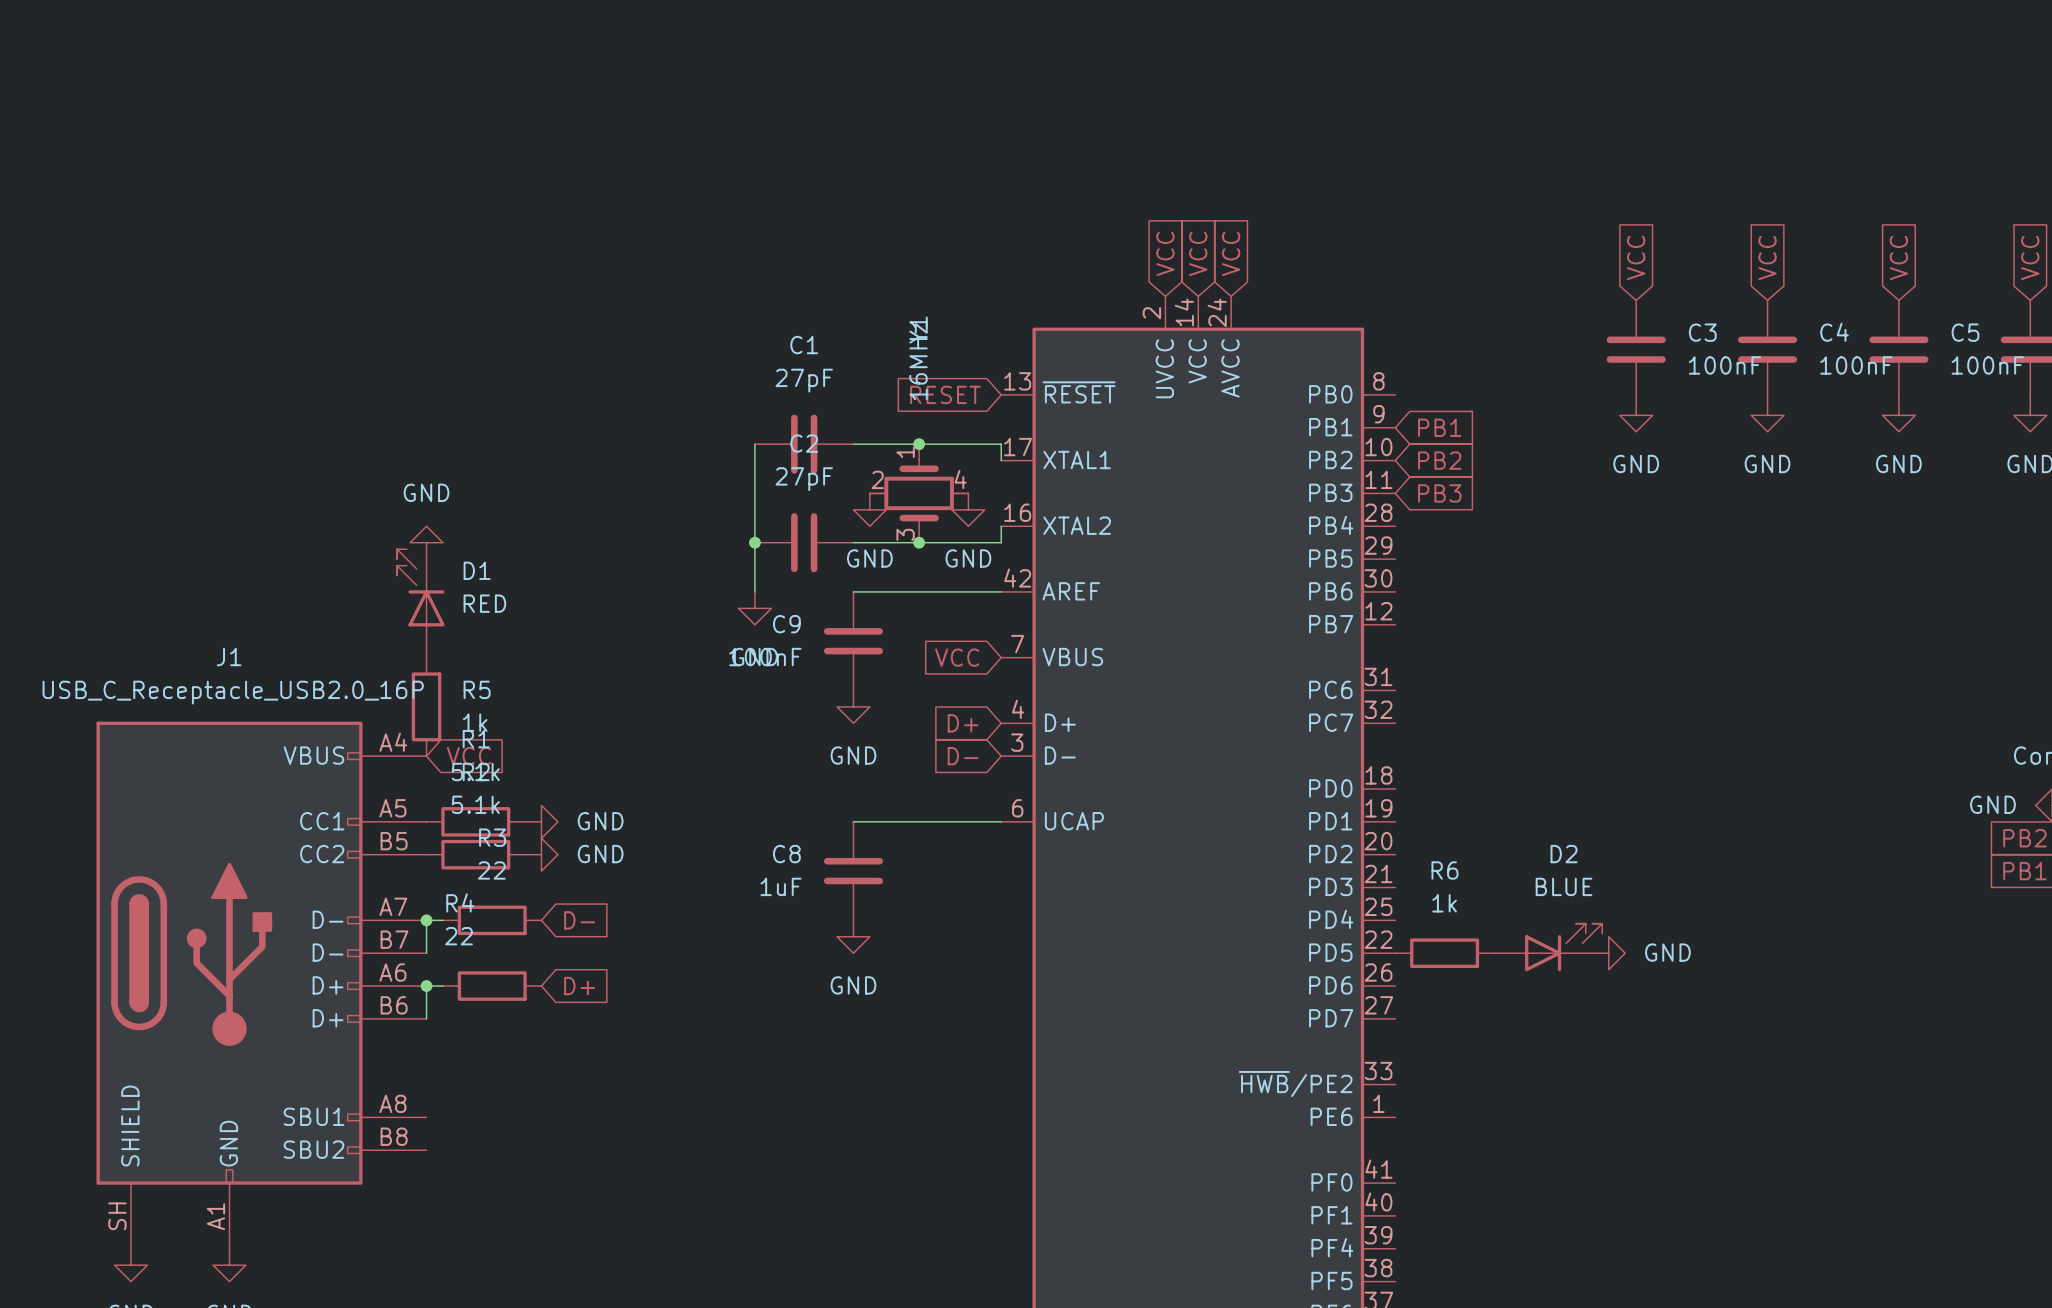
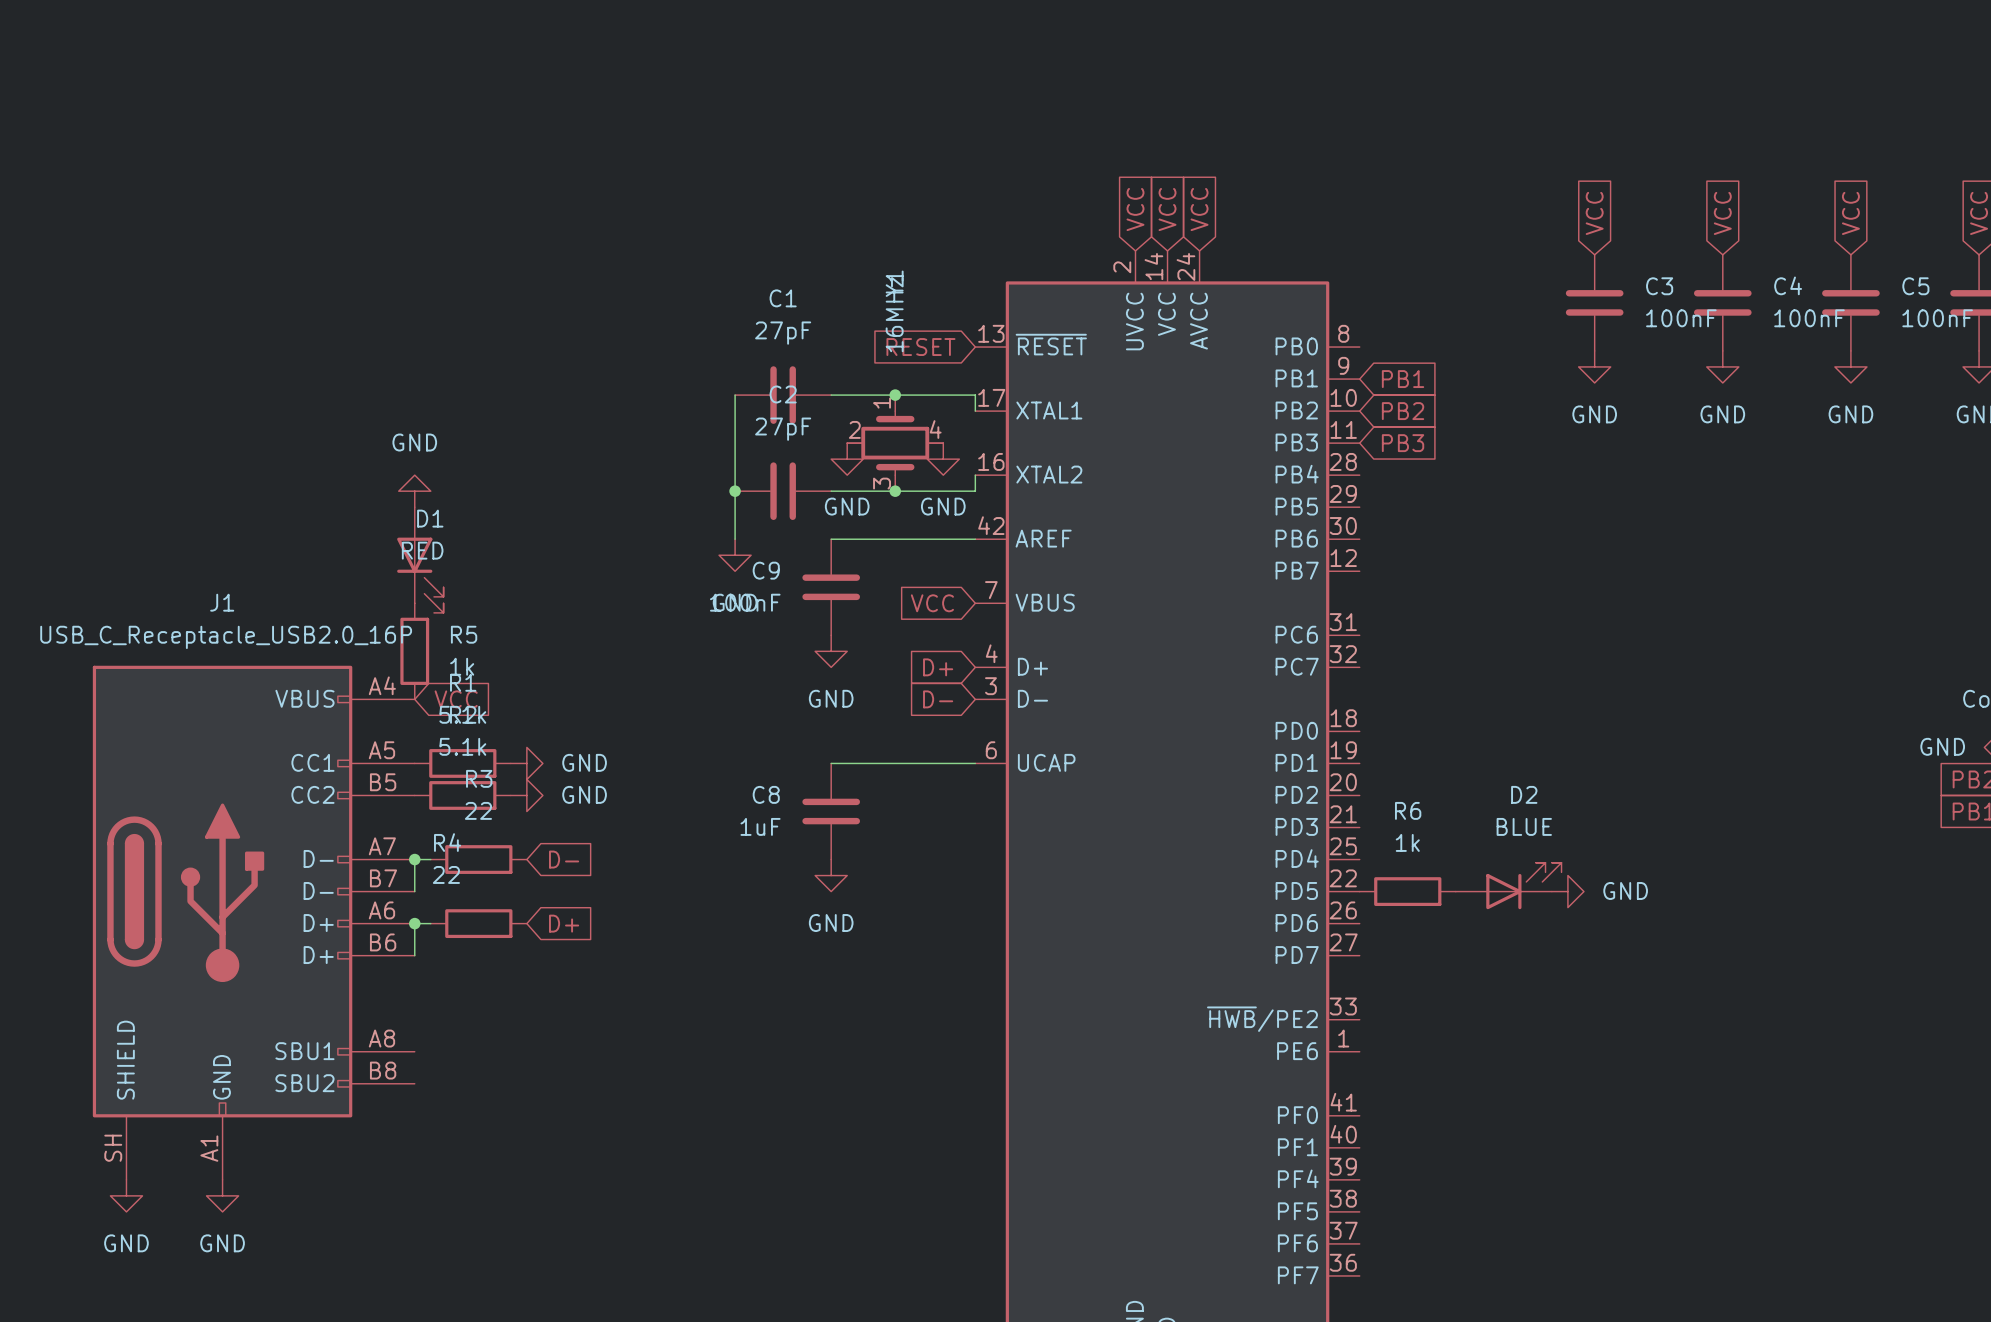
D1 name position: D1 (477, 570) -> D1 (430, 518)
D1 rotation: 0° (420, 587) -> 180° (420, 575)
D1 value position: RED (484, 603) -> RED (422, 550)

